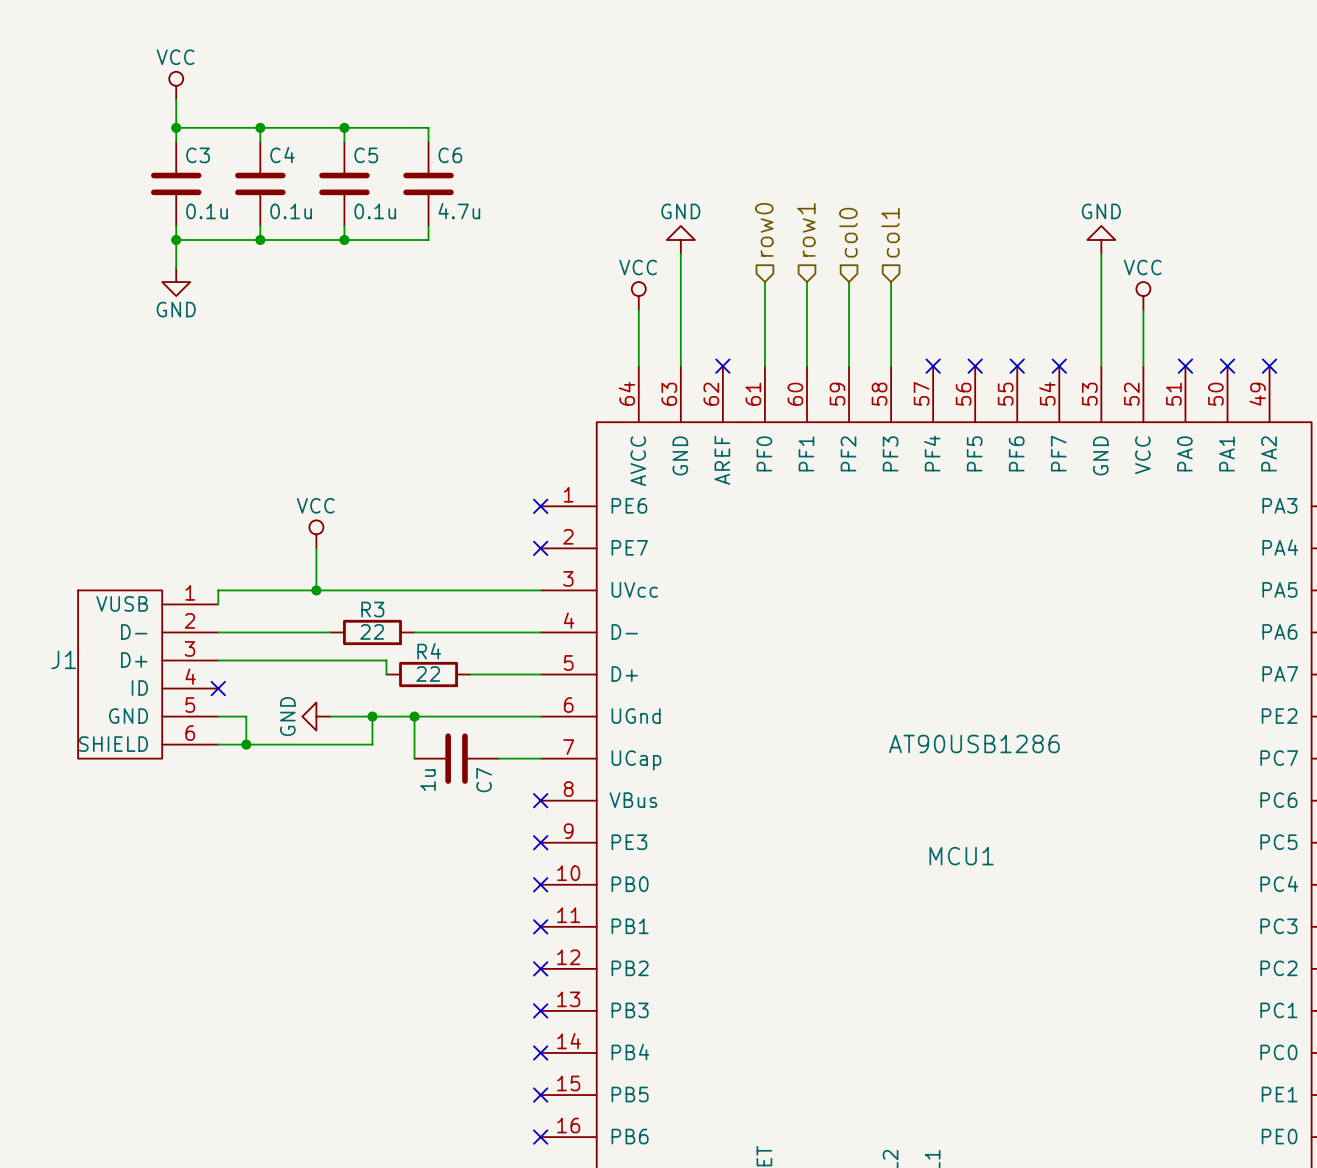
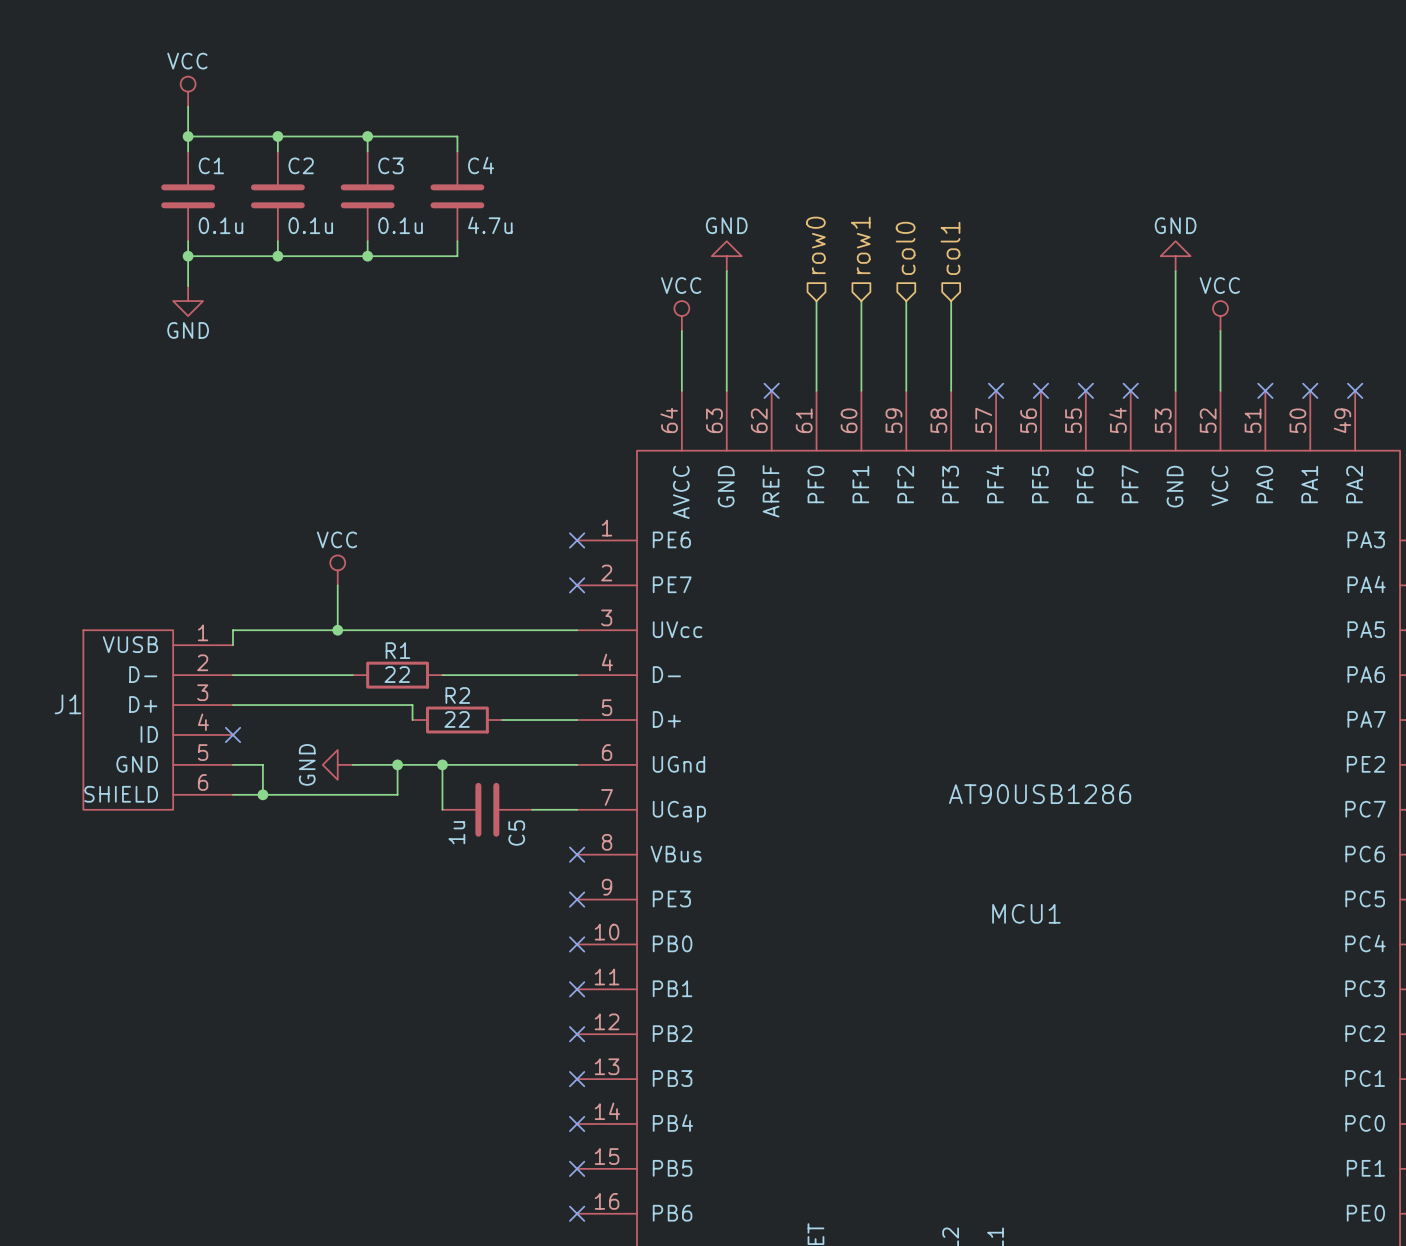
C3 name: C3 (198, 155) -> C1 (211, 165)
C4 name: C4 (282, 155) -> C2 (301, 165)
C5 name: C5 (366, 155) -> C3 (390, 165)
C6 name: C6 (450, 155) -> C4 (481, 165)
R3 name: R3 (372, 609) -> R1 (397, 650)
R4 name: R4 (429, 651) -> R2 (457, 695)
C7 name: C7 (484, 780) -> C5 (516, 833)

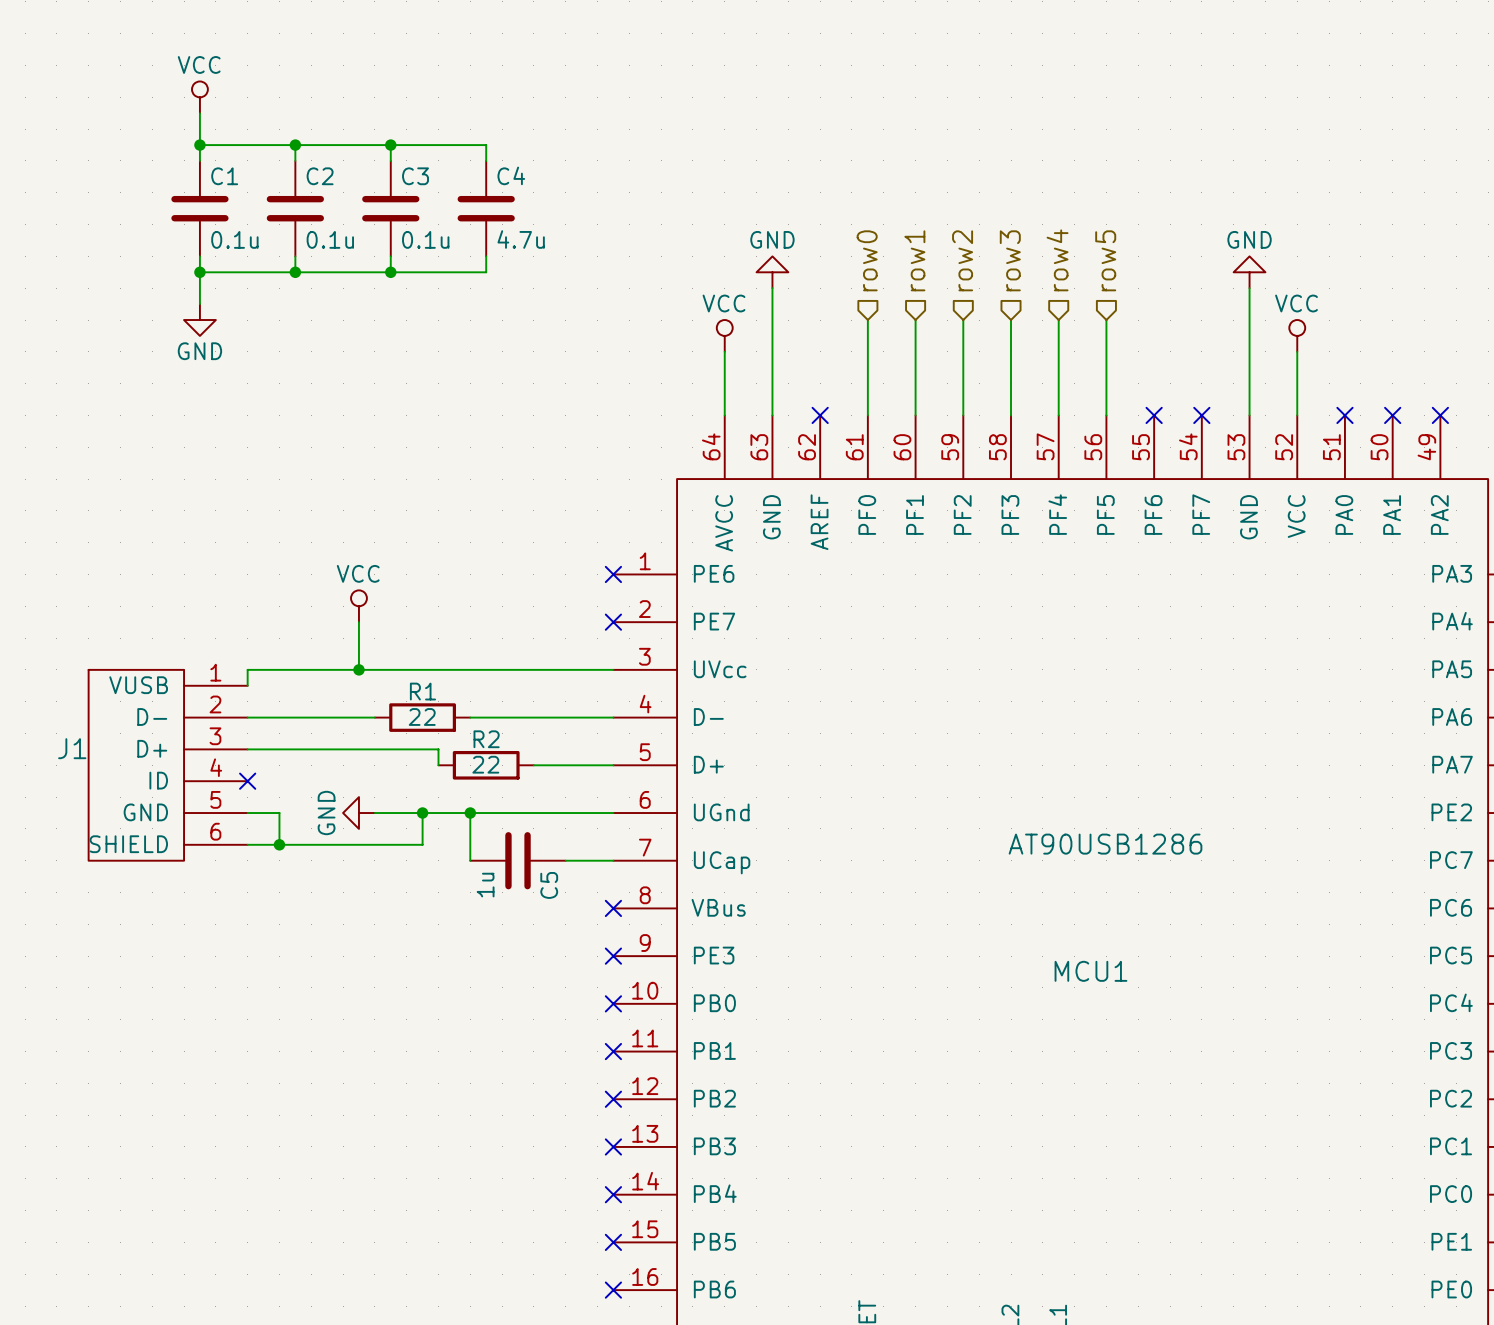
hierarchical label: none -> row4 (1057, 260)
hierarchical label: none -> row5 (1105, 260)
hierarchical label: col0 (905, 248) -> row2 (962, 260)
hierarchical label: col1 (950, 248) -> row3 (1010, 260)
wire: none -> (1058, 320) (1058, 415)
wire: none -> (1106, 320) (1106, 415)
no-connect mark: (996, 390) -> none
no-connect mark: (1040, 390) -> none

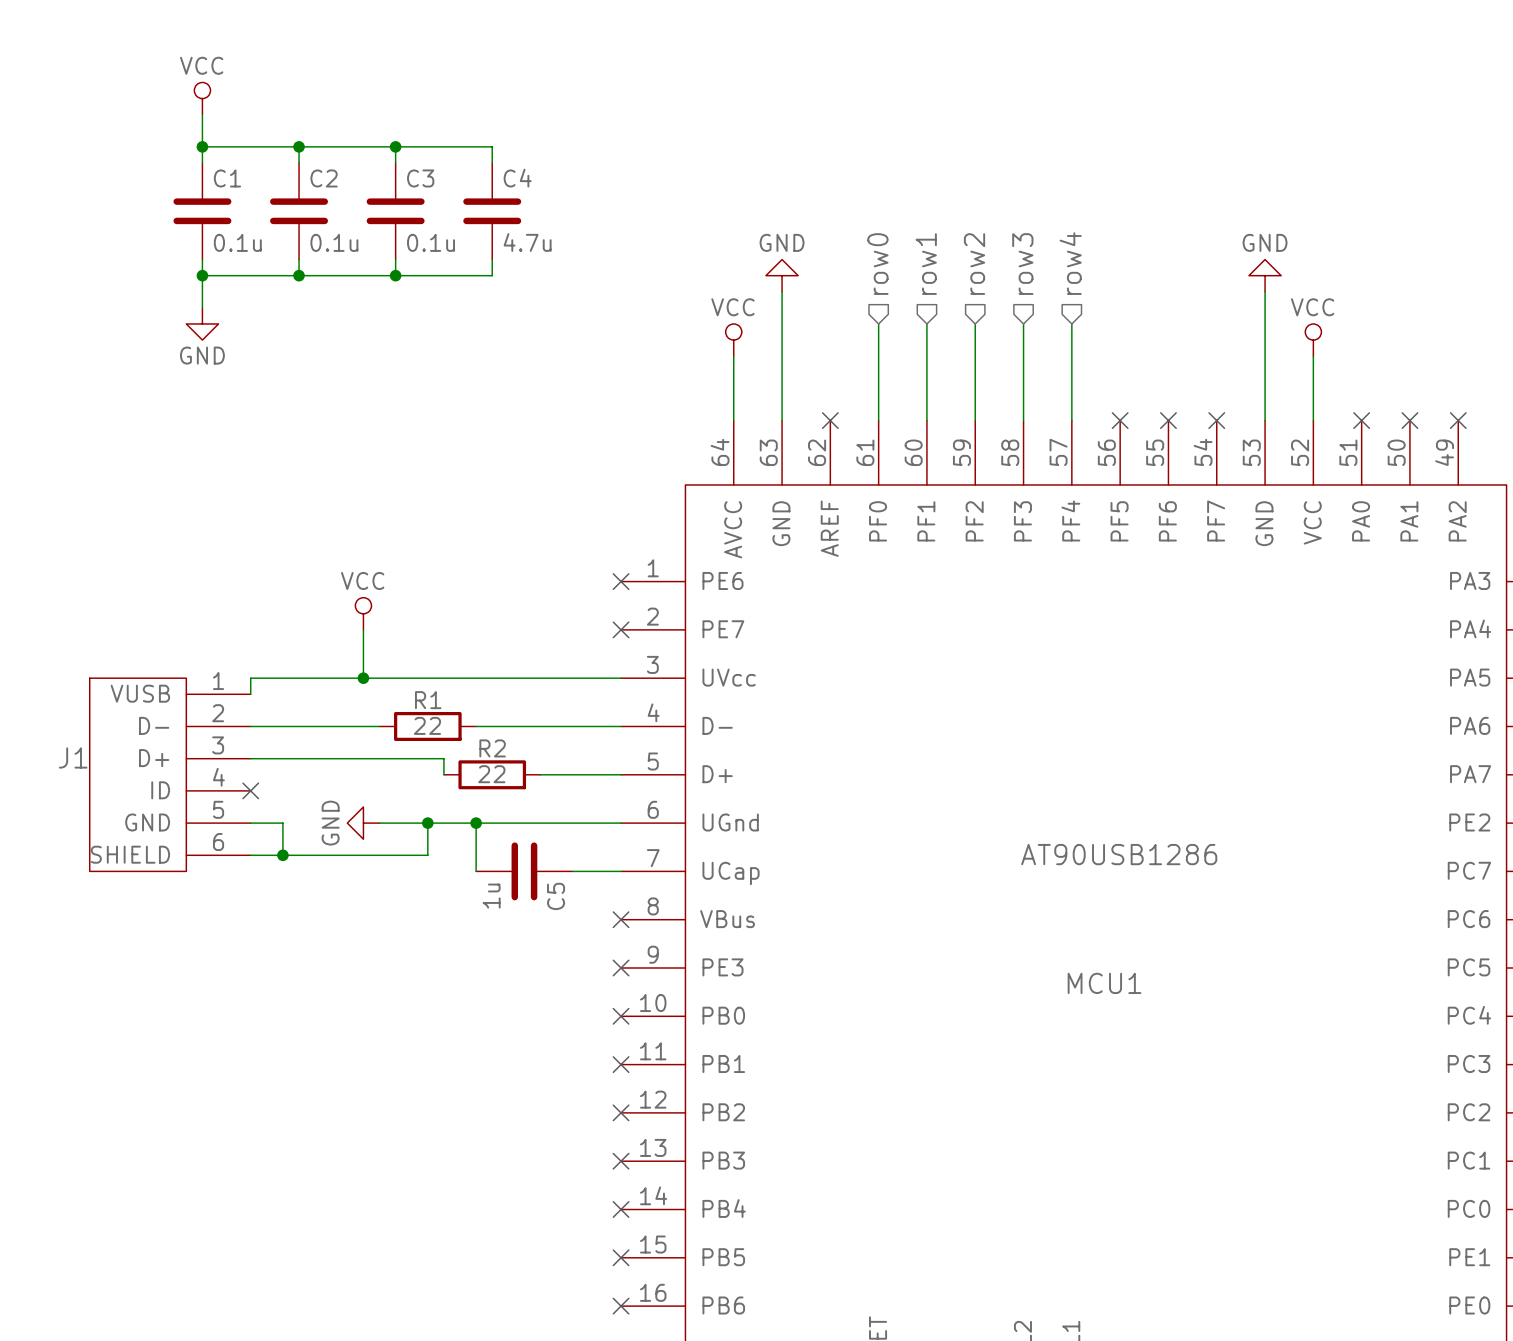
hierarchical label: row5 (1105, 260) -> none
wire: (1106, 320) (1106, 415) -> none
no-connect mark: none -> (1120, 420)

